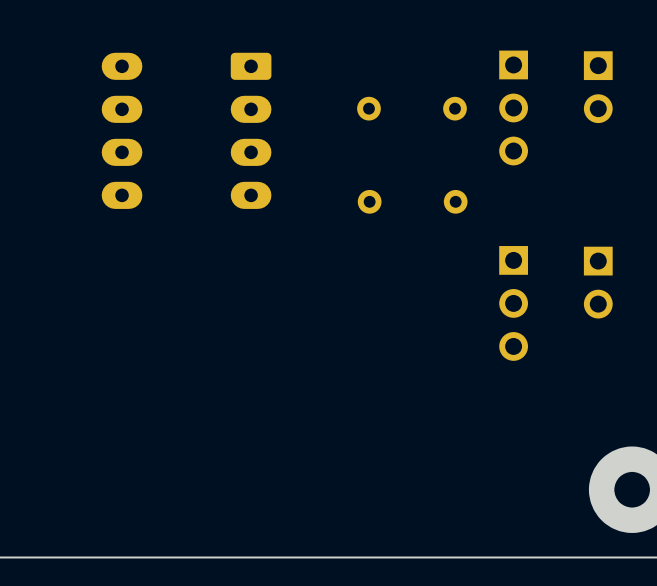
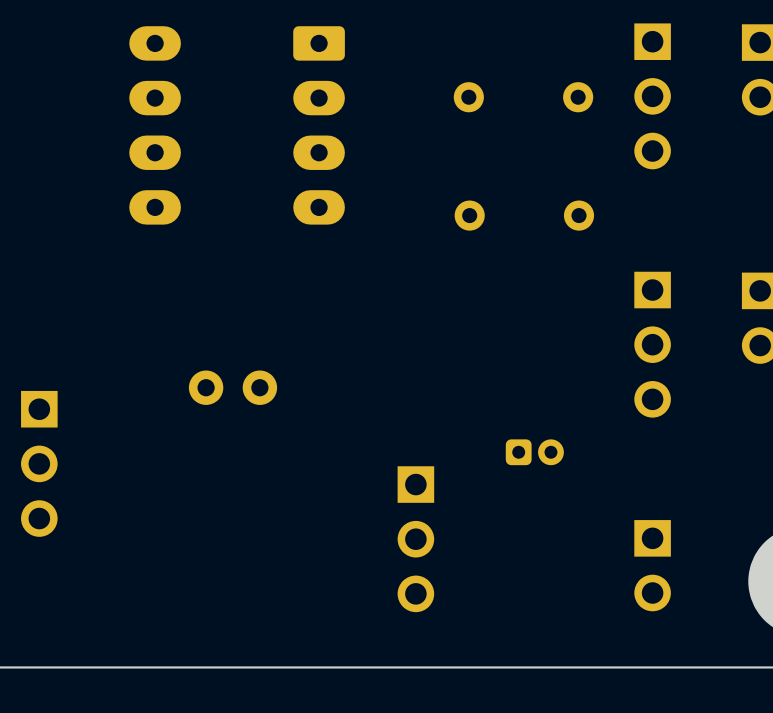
part: none -> (232, 387)
part: none -> (534, 452)
part: none -> (39, 463)
part: none -> (415, 539)
part: none -> (652, 565)

